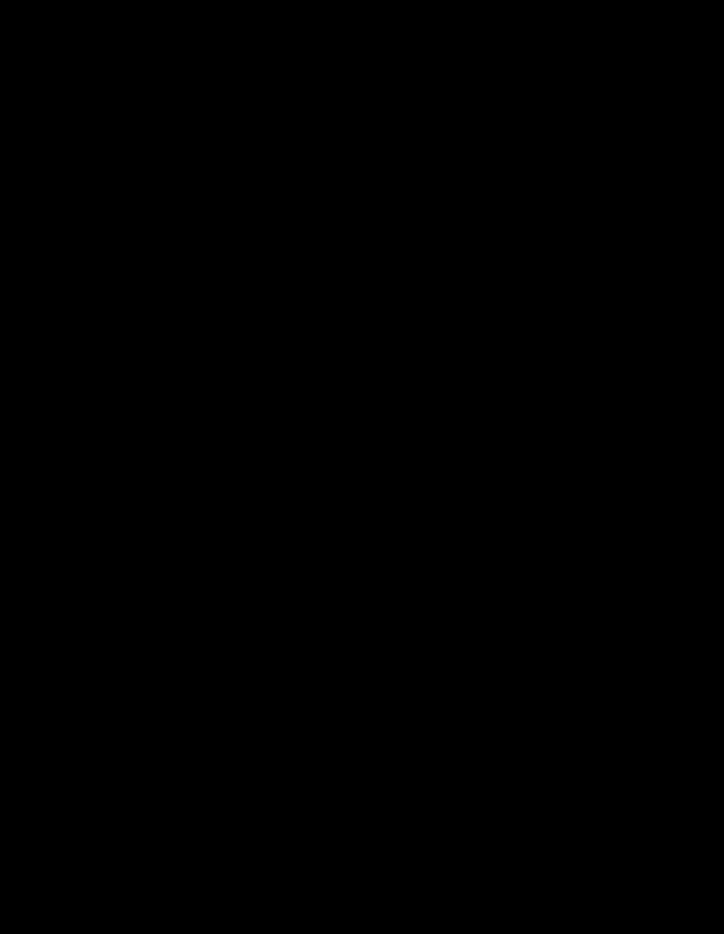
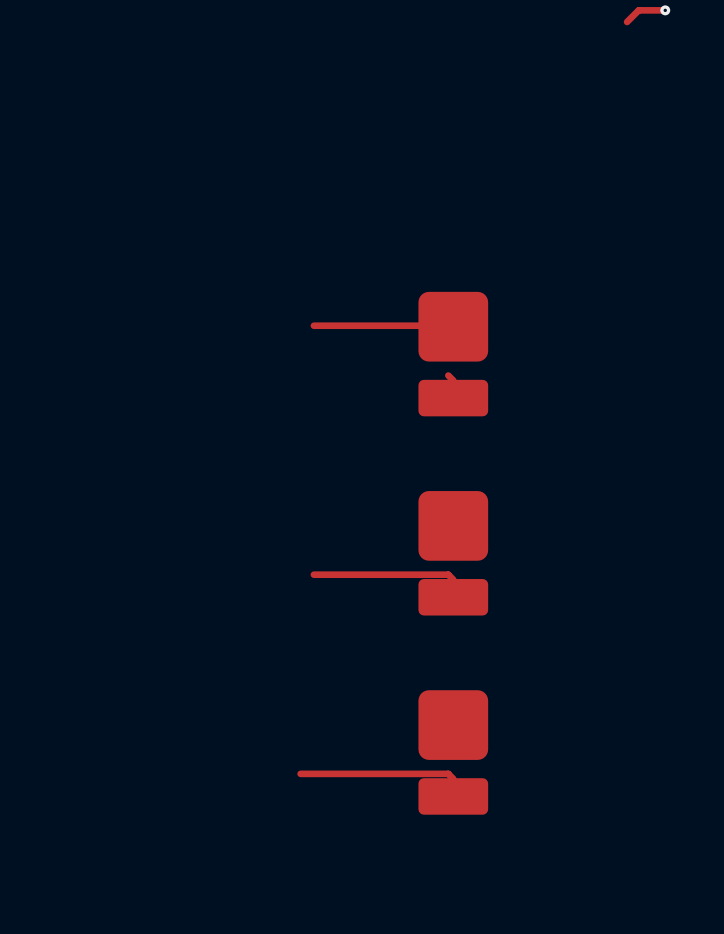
top track: none -> (665, 10) (638, 10) (627, 21)
via: none -> (665, 10)
top track: none -> (313, 325) (453, 326)
part: none -> (453, 354)
top track: none -> (448, 375) (453, 380)
part: none -> (453, 553)
top track: none -> (313, 574) (448, 574) (453, 579)
part: none -> (453, 752)
top track: none -> (300, 773) (448, 773) (453, 778)

